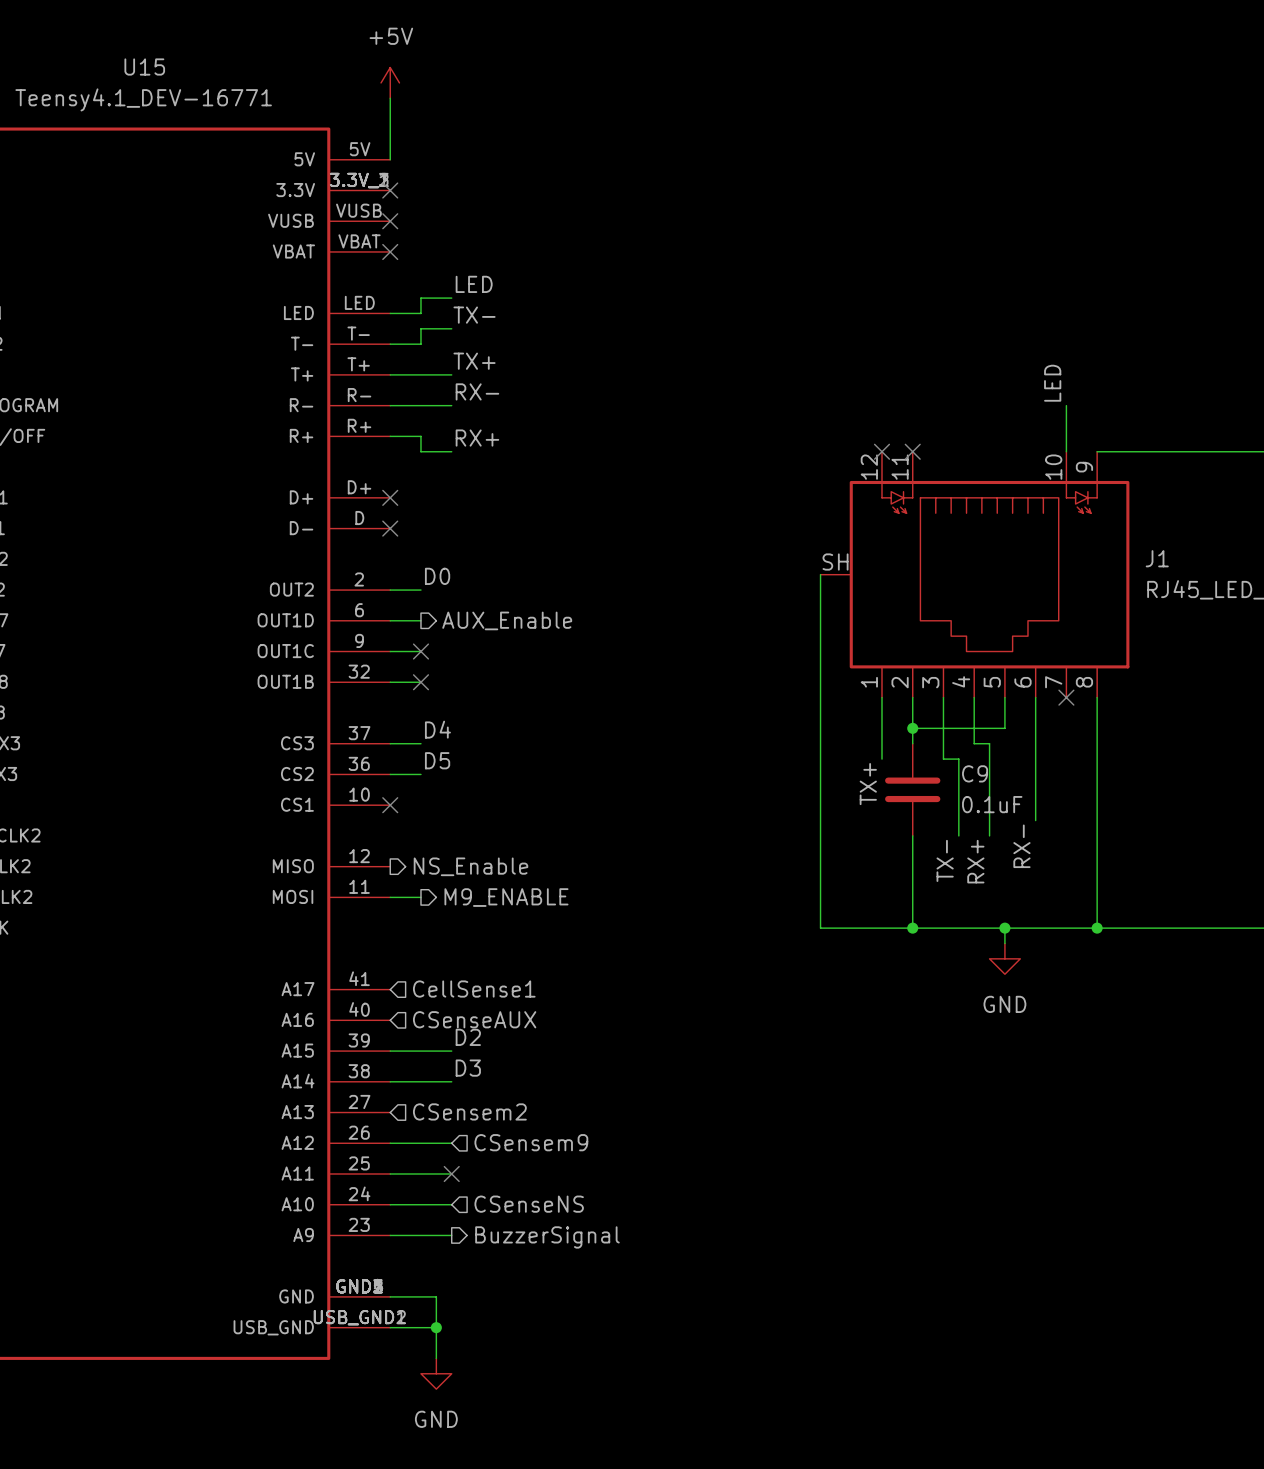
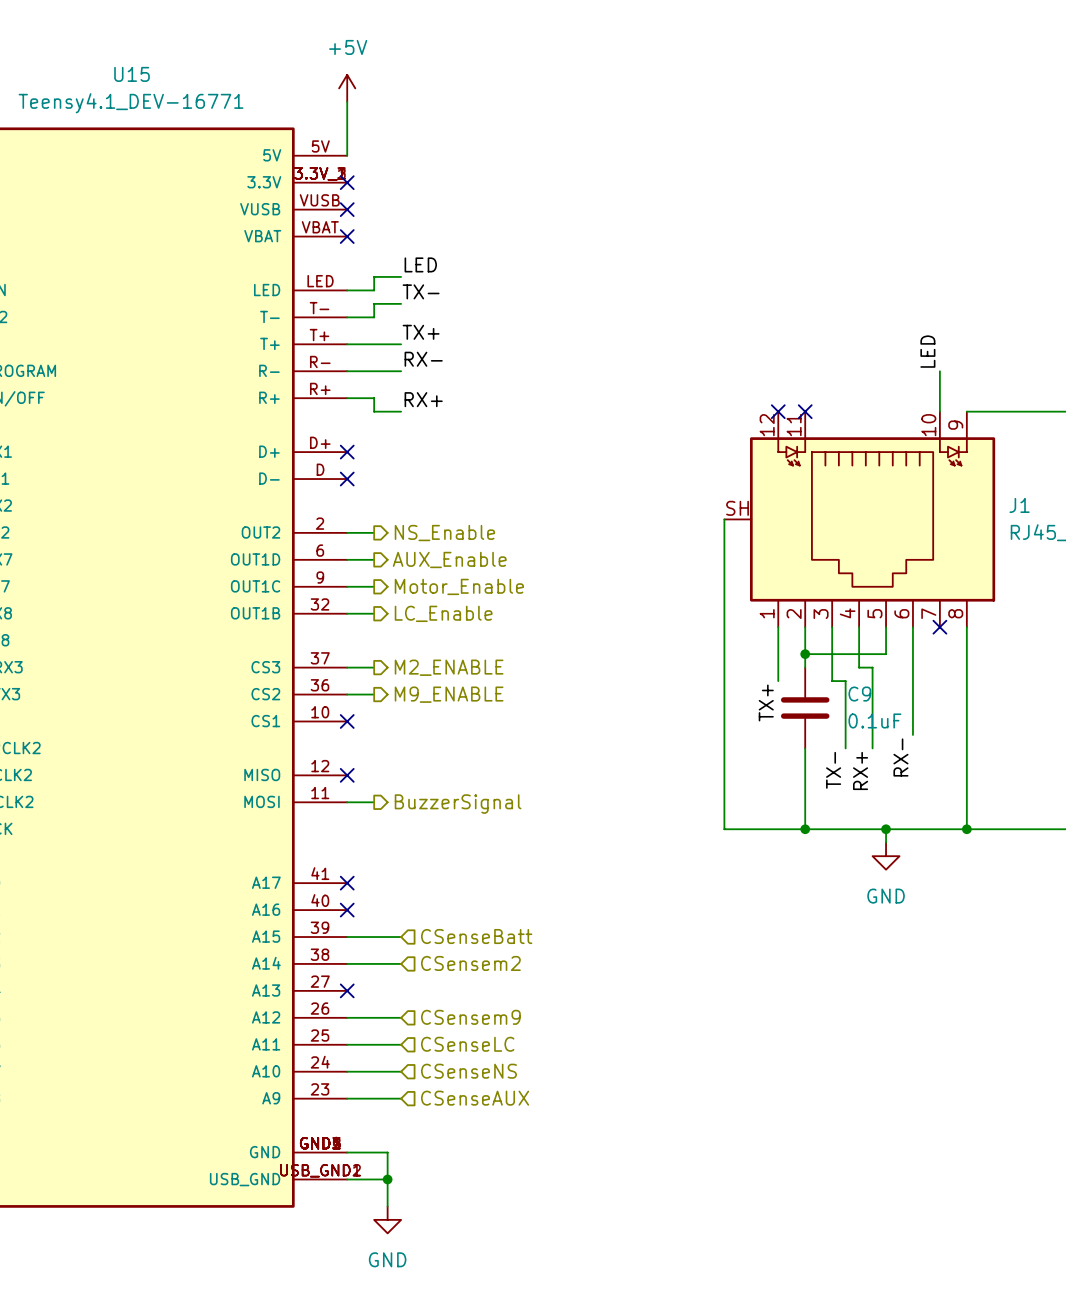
label: D0 (437, 576) -> none
no-connect mark: (420, 651) -> none
hierarchical label: none -> Motor_Enable (459, 586)
no-connect mark: (420, 682) -> none
hierarchical label: none -> LC_Enable (443, 613)
label: D4 (437, 729) -> none
hierarchical label: none -> M2_ENABLE (449, 667)
label: D5 (437, 760) -> none
hierarchical label: none -> M9_ENABLE (449, 694)
no-connect mark: none -> (347, 775)
hierarchical label position: NS_Enable (470, 866) -> NS_Enable (444, 533)
hierarchical label: M9_ENABLE (506, 897) -> BuzzerSignal (458, 804)
no-connect mark: none -> (347, 883)
hierarchical label: CellSense1 (474, 989) -> none
hierarchical label: CSenseAUX (474, 1019) -> CSenseBatt (476, 936)
no-connect mark: none -> (347, 910)
label: D2 (468, 1037) -> none
label: D3 (468, 1068) -> none
hierarchical label position: CSensem2 (469, 1111) -> CSensem2 (470, 963)
no-connect mark: none -> (347, 990)
hierarchical label: none -> CSenseLC (467, 1044)
no-connect mark: (451, 1174) -> none
hierarchical label shape: output (547, 1237) -> input (475, 1098)
hierarchical label: BuzzerSignal (547, 1237) -> CSenseAUX (475, 1098)

